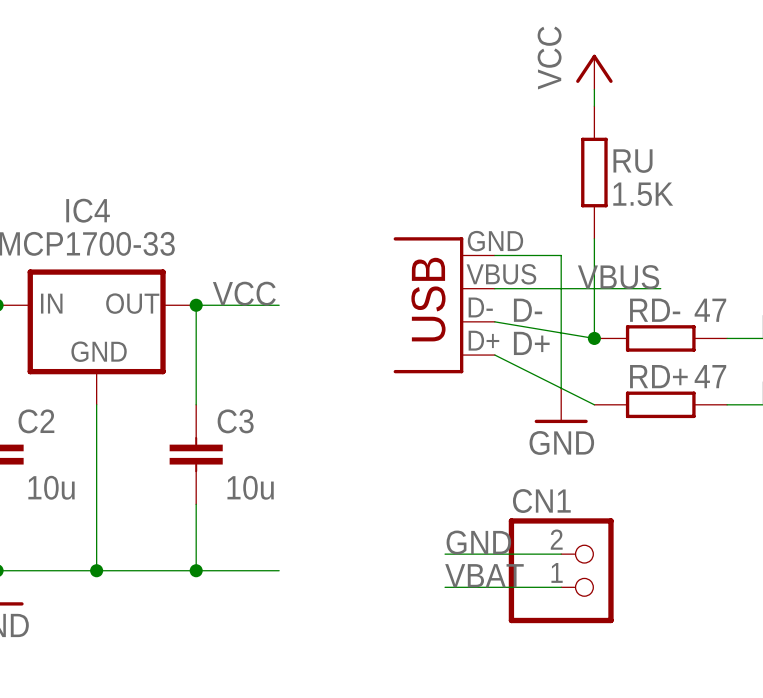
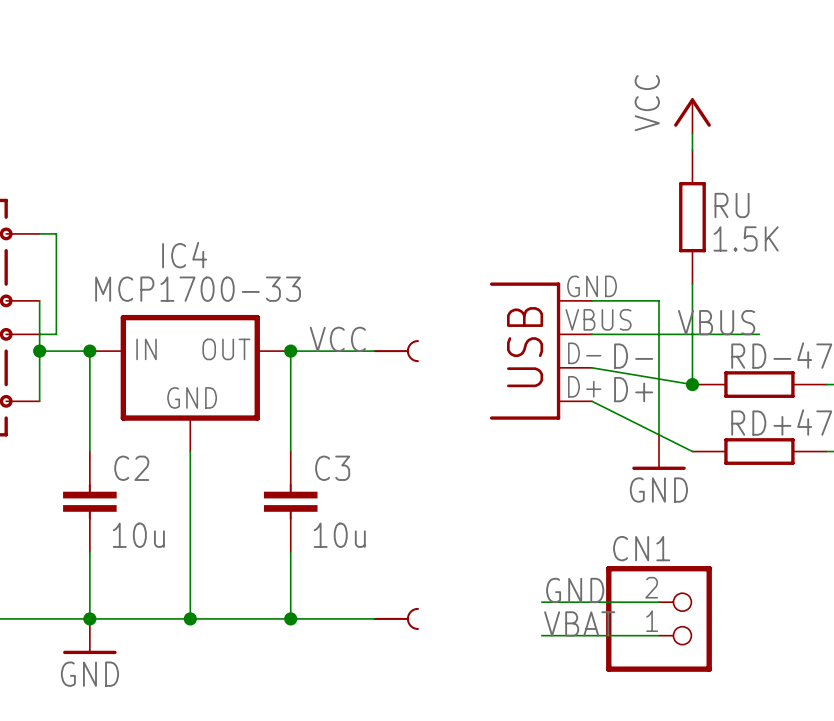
part: none -> (396, 351)
part: none -> (396, 618)

